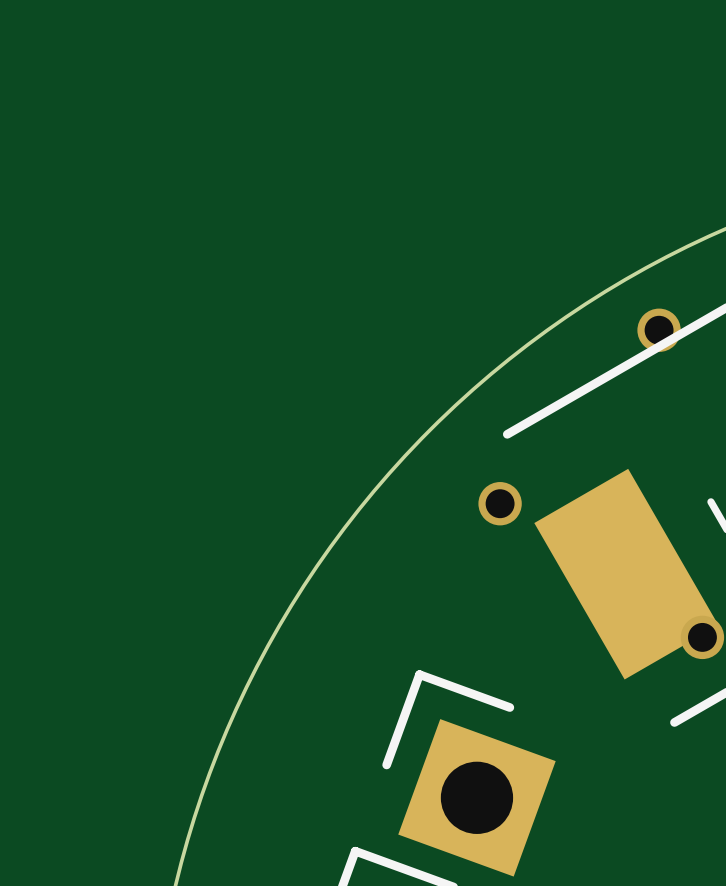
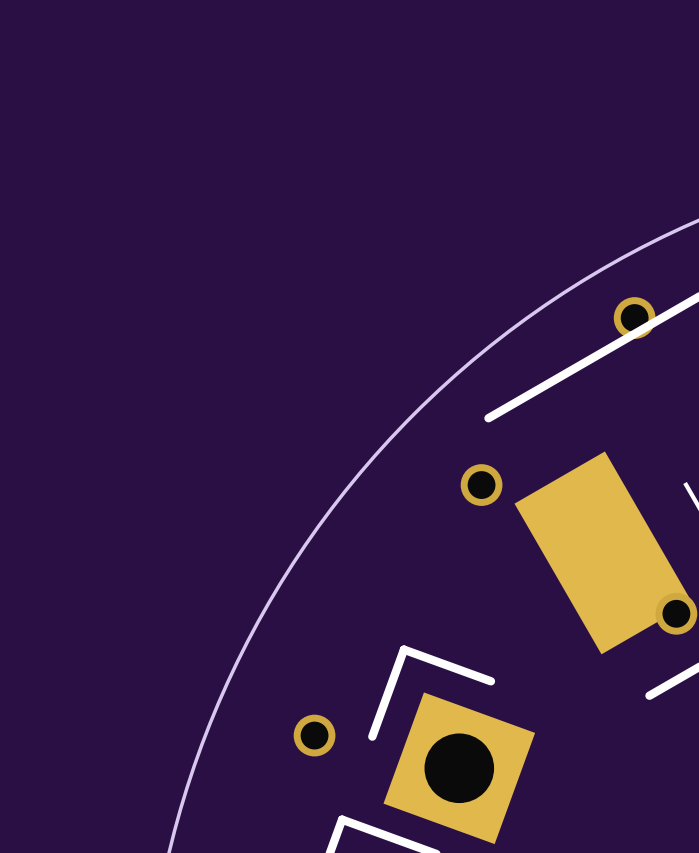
via: none -> (314, 735)

